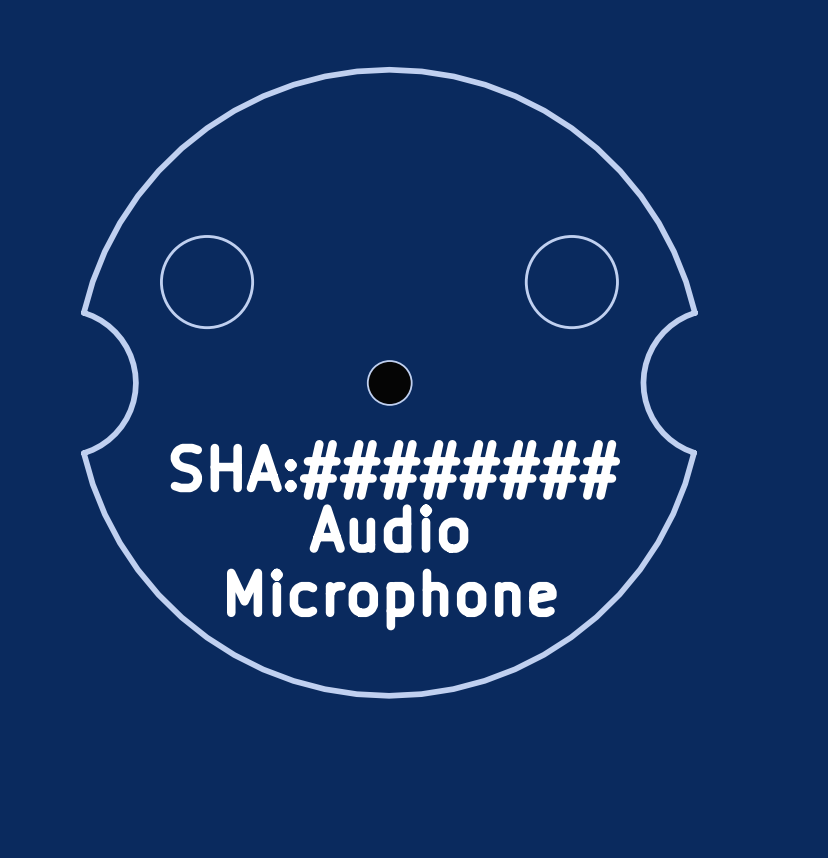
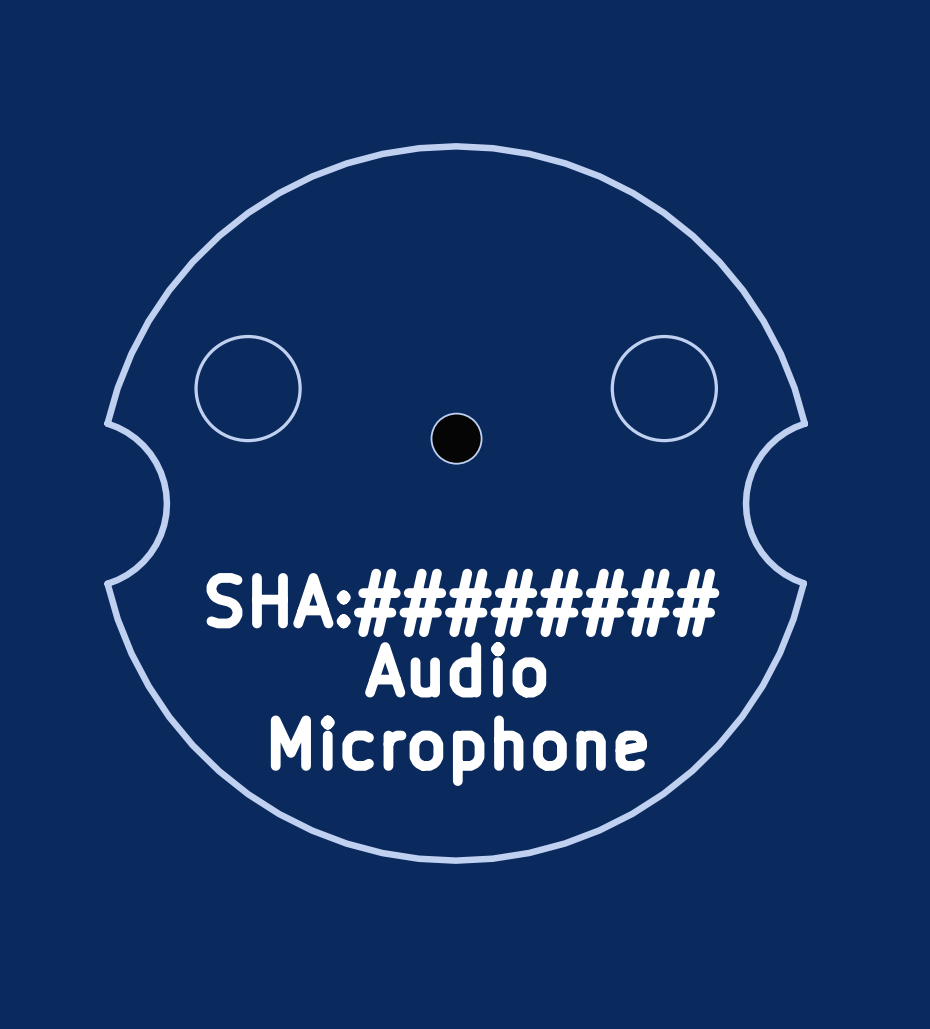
part position: (389, 382) -> (456, 438)

